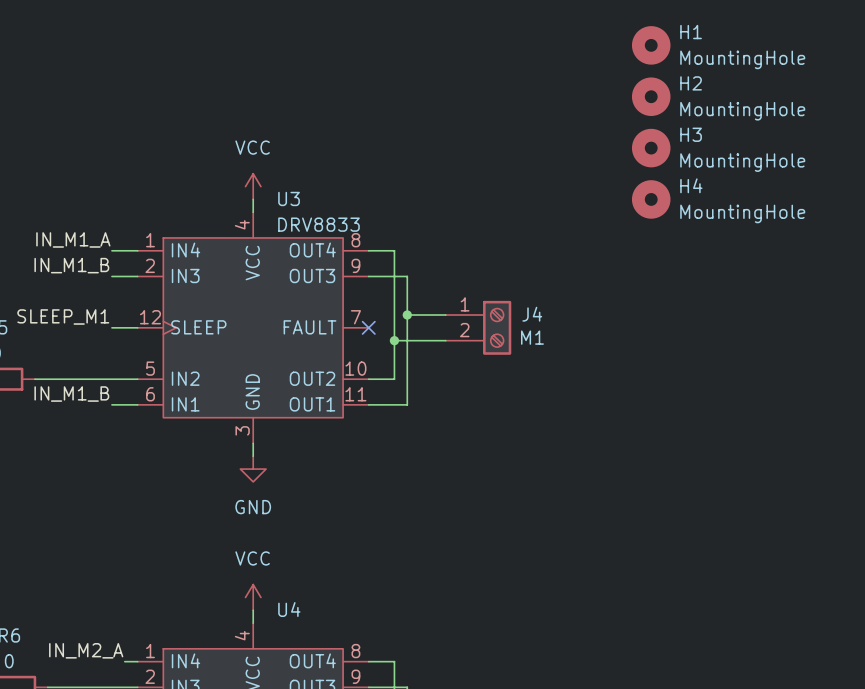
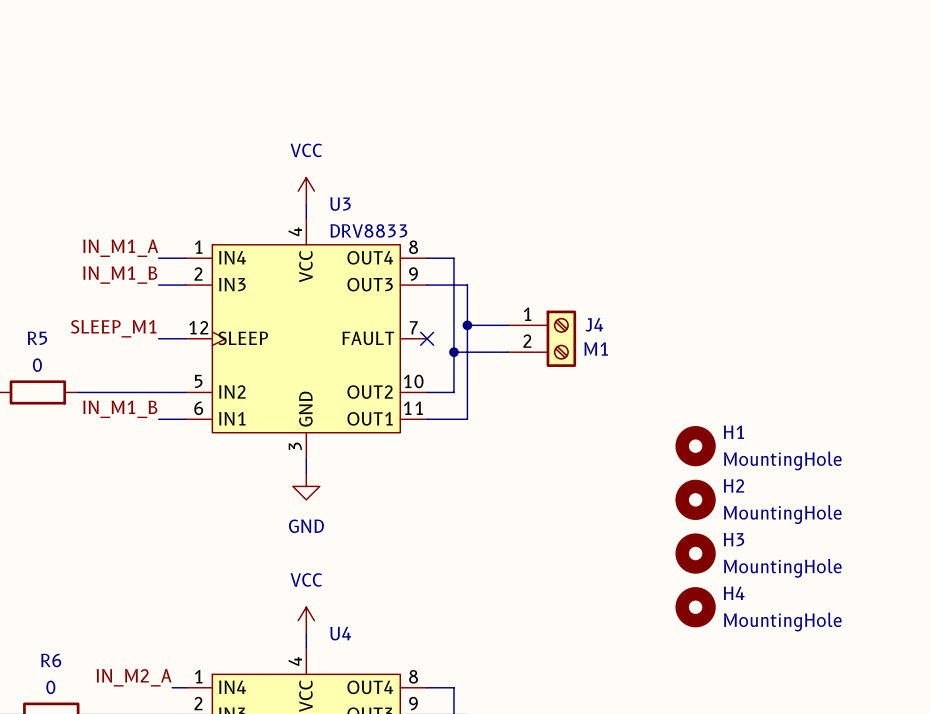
H1 position: (651, 45) -> (695, 446)
H2 position: (651, 96) -> (695, 499)
H3 position: (651, 148) -> (695, 553)
H4 position: (651, 199) -> (695, 607)

